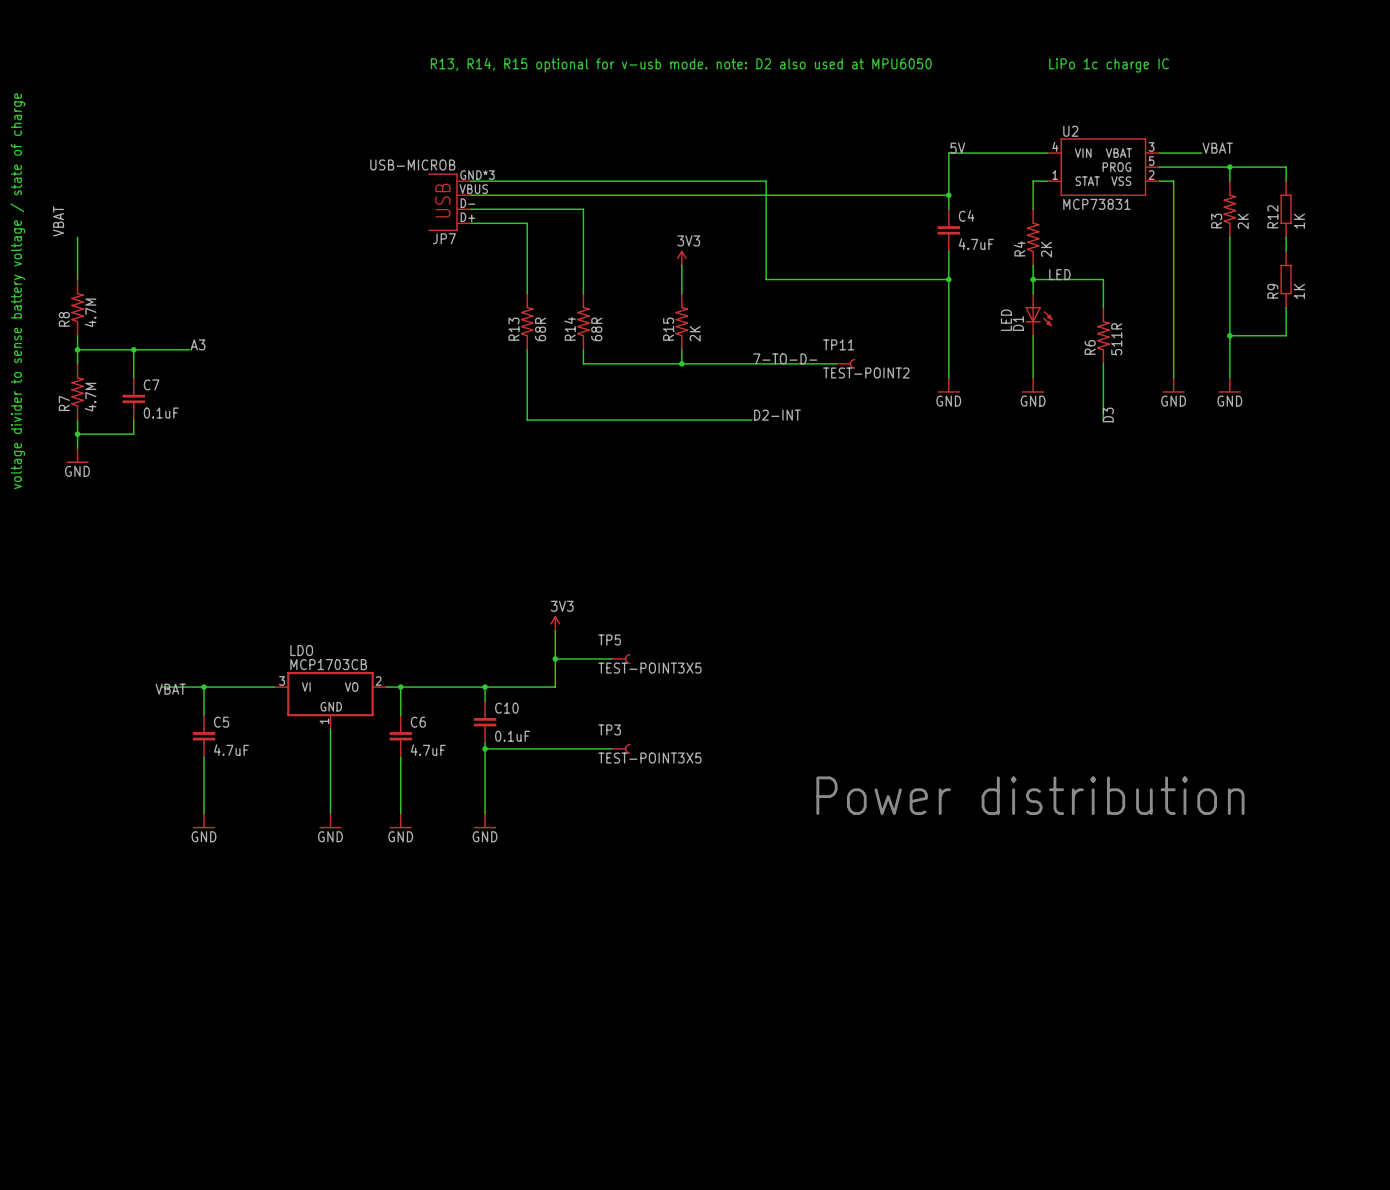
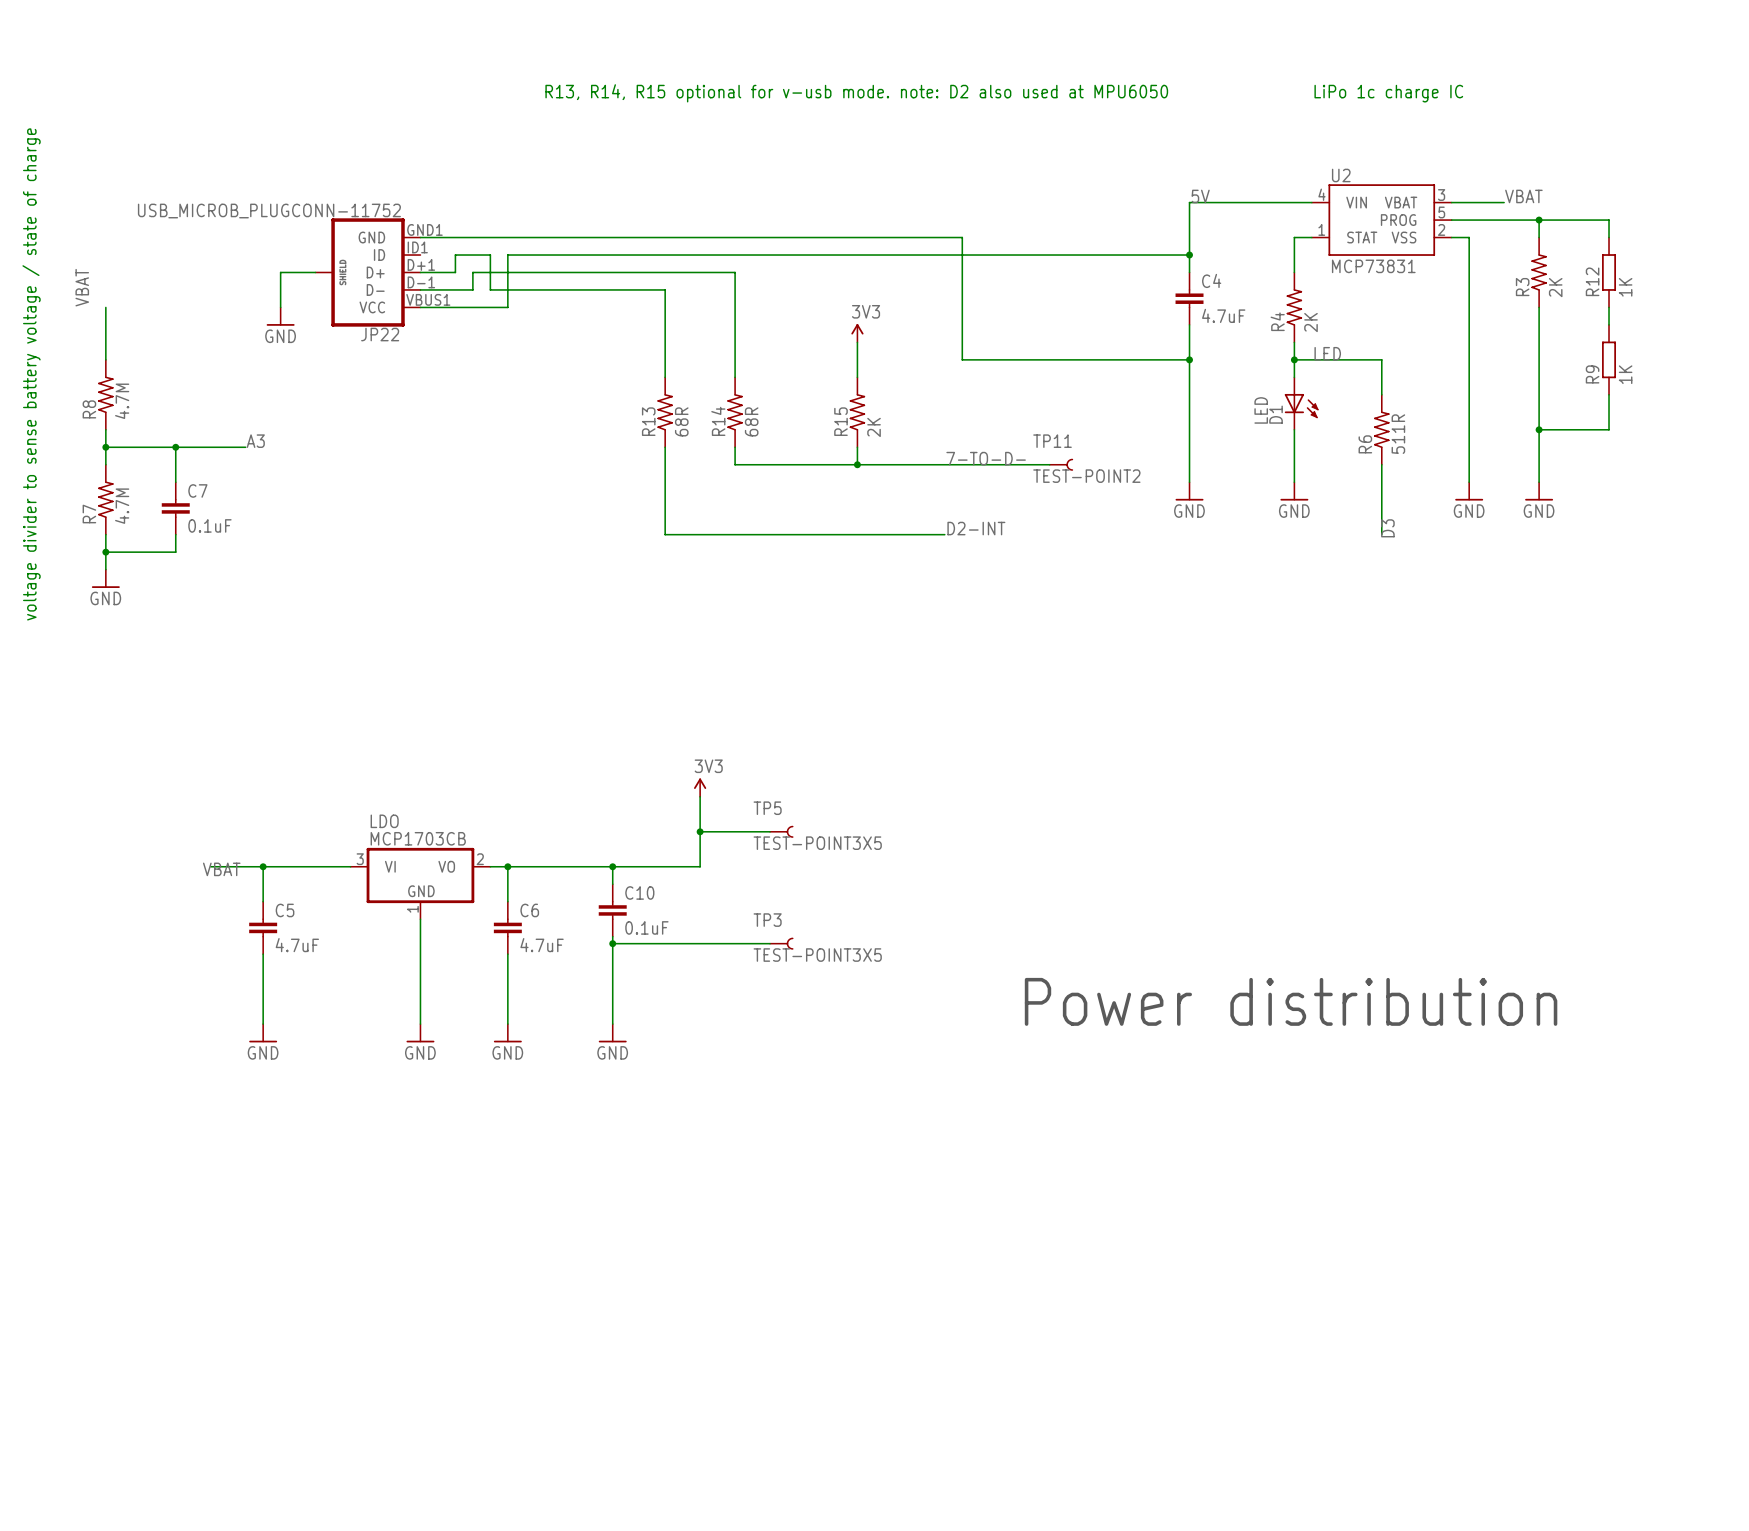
wire: none -> (420, 237) (595, 237)
wire: none -> (595, 255) (507, 255) (507, 307) (420, 307)
JP7: USB-MICROB (449, 202) -> none
wire: none -> (315, 272) (280, 272) (280, 307)
JP22: none -> USB_MICROB_PLUGCONN-11752 (368, 272)
wire: none -> (420, 272) (455, 272) (455, 255) (490, 255) (490, 289) (595, 289)
wire: none -> (595, 272) (472, 272) (472, 289) (420, 289)
power symbol: none -> GND (280, 316)

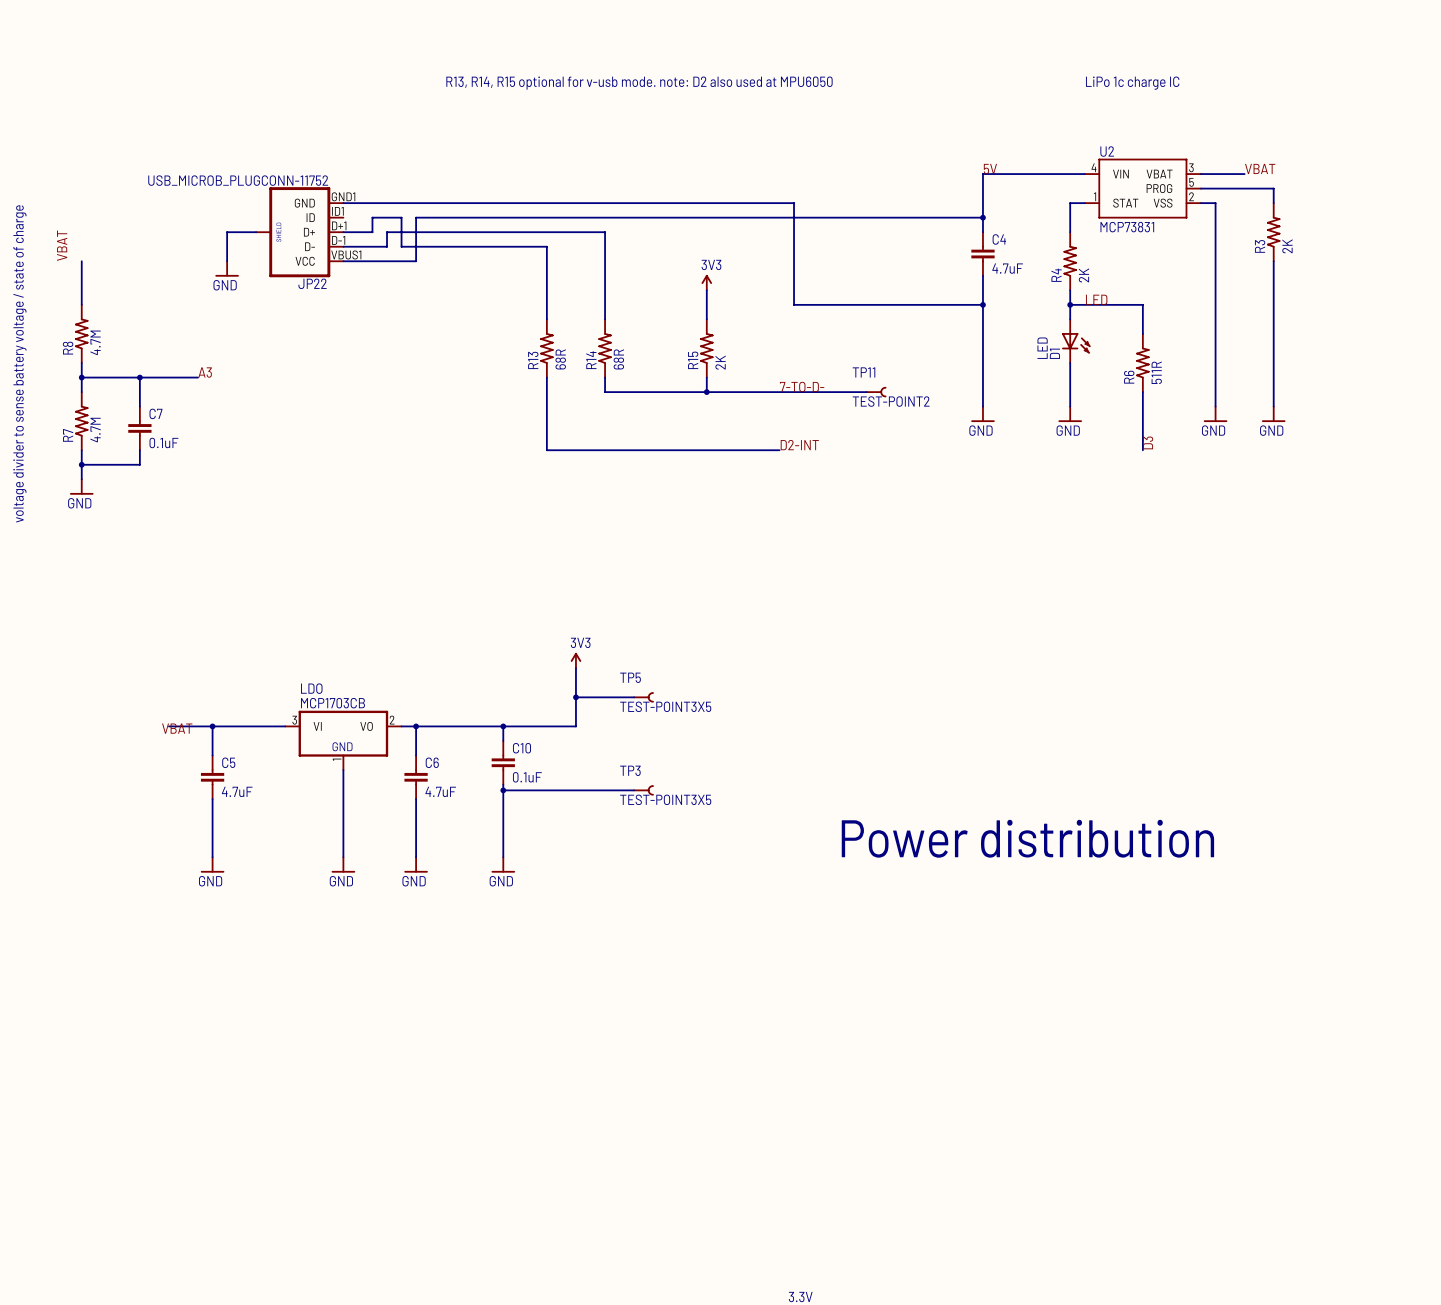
wire: (1539, 220) (1609, 220) (1609, 237) -> none
junction: (1539, 220) -> none
R12: 1K (1609, 272) -> none
wire: (1609, 307) (1609, 324) -> none
R9: 1K (1609, 359) -> none
wire: (1609, 394) (1609, 429) (1539, 429) -> none
junction: (1539, 429) -> none

